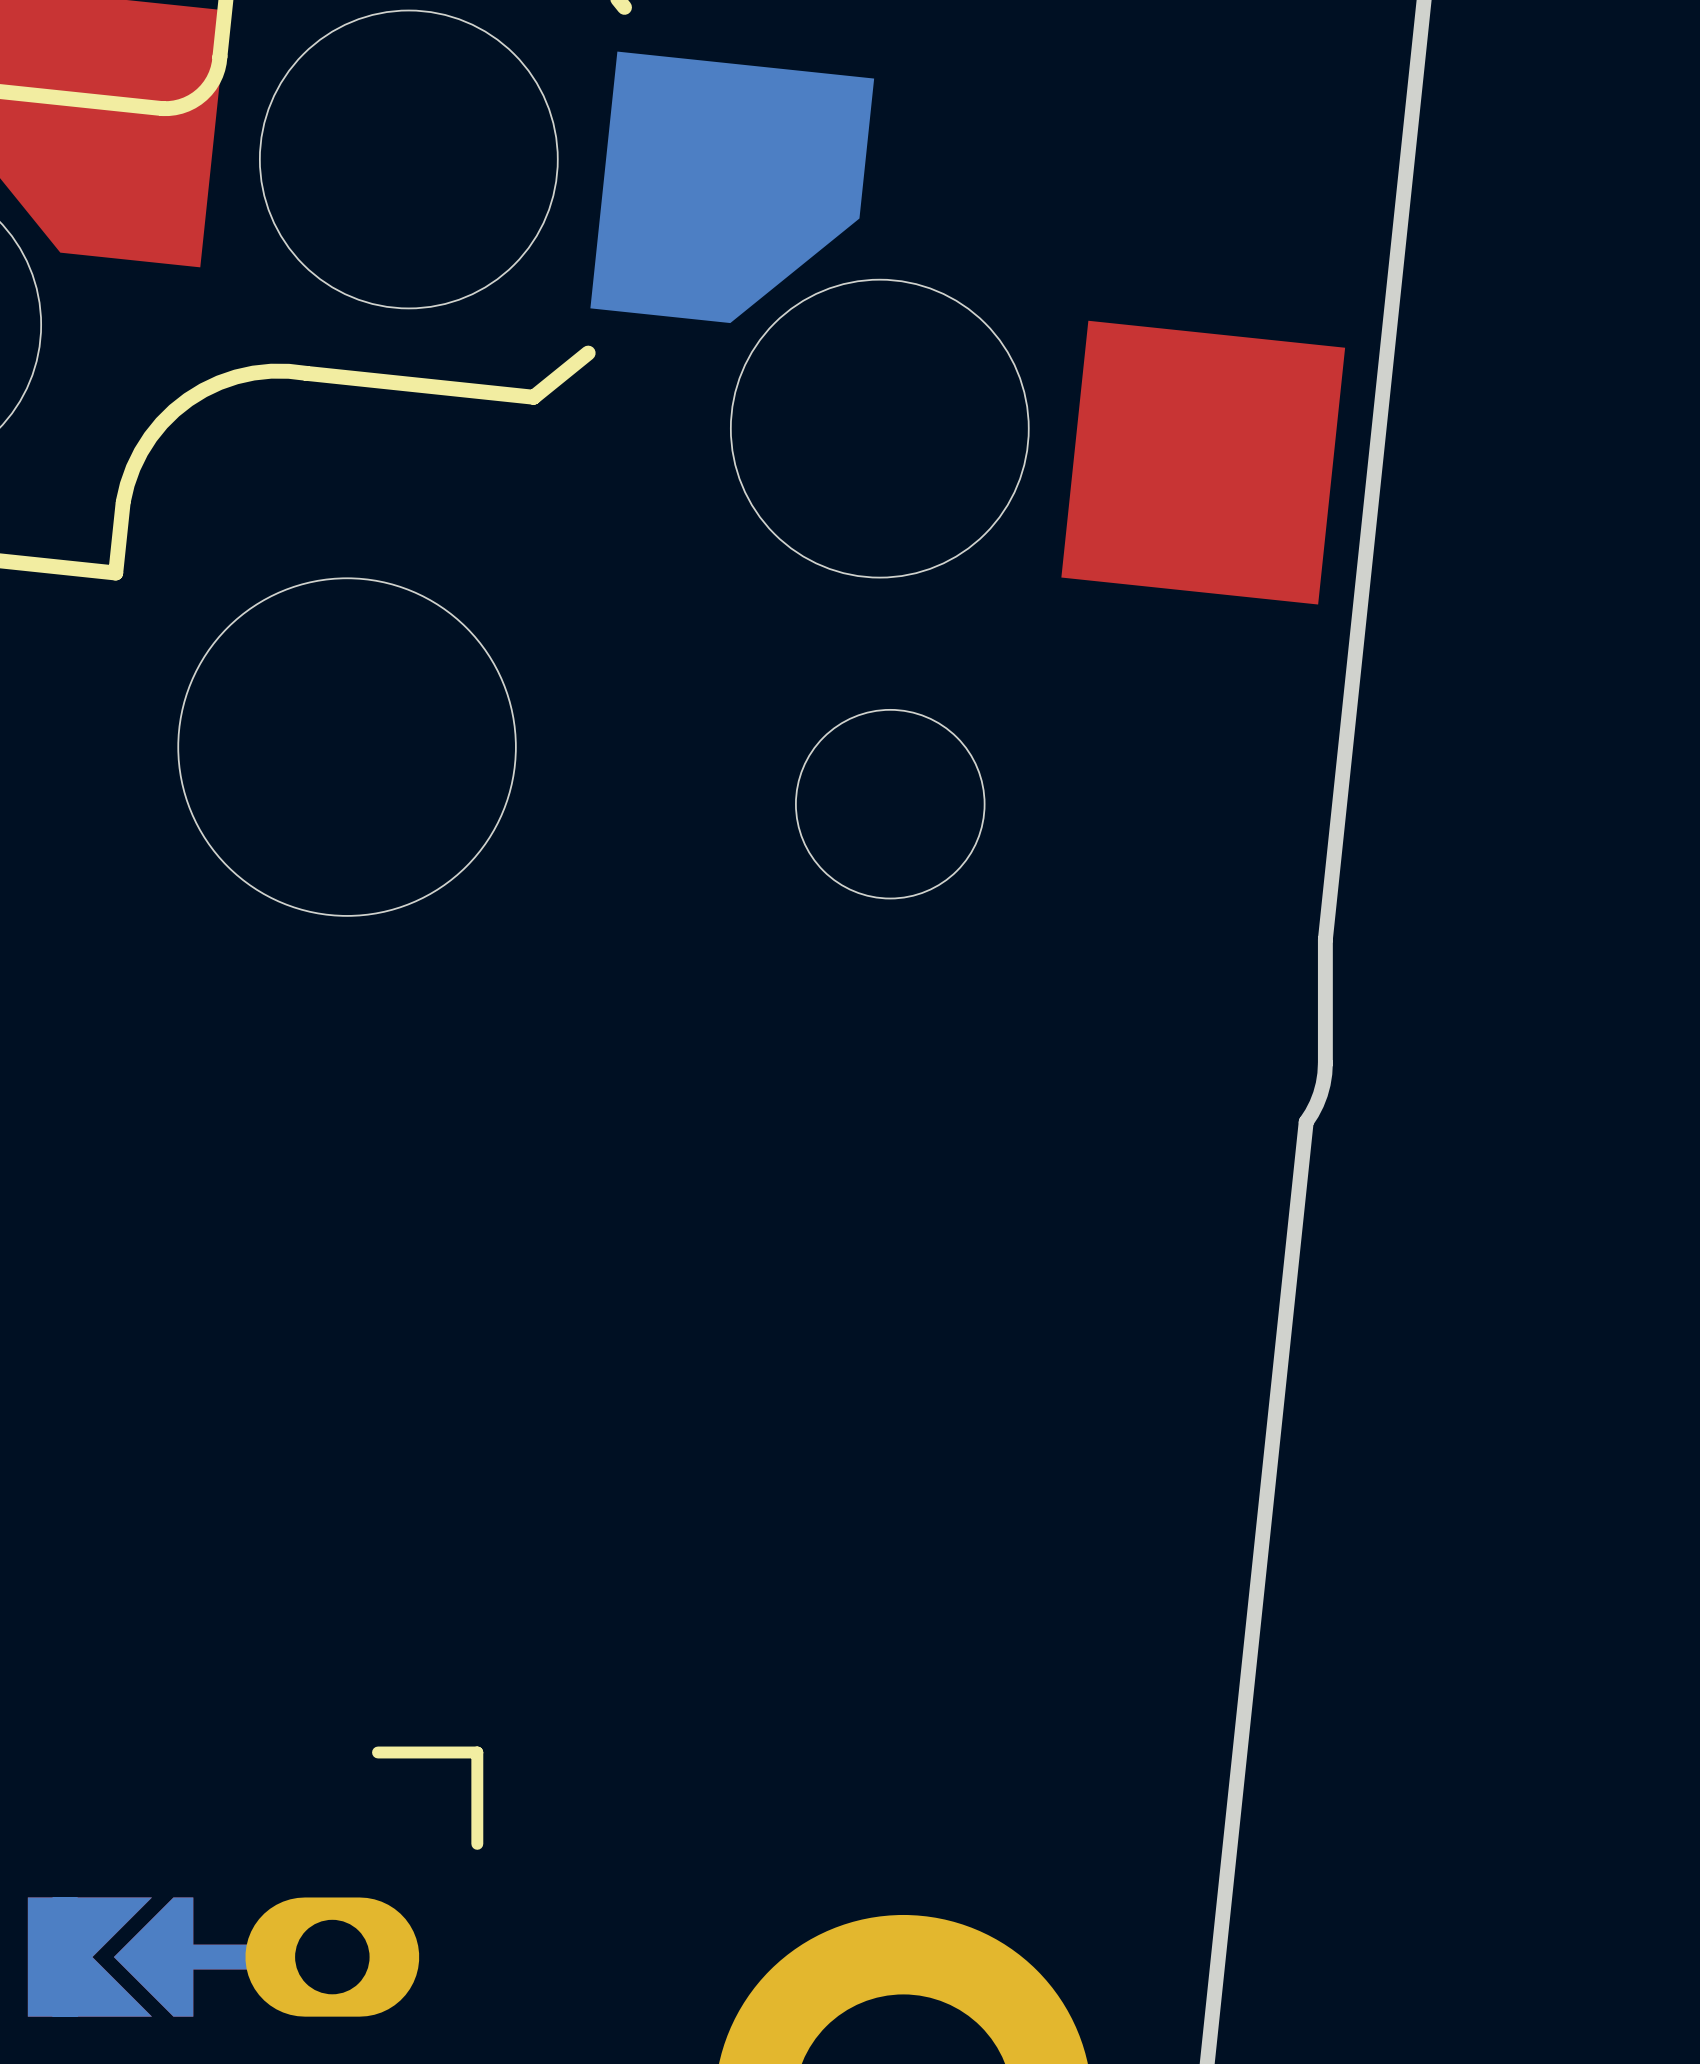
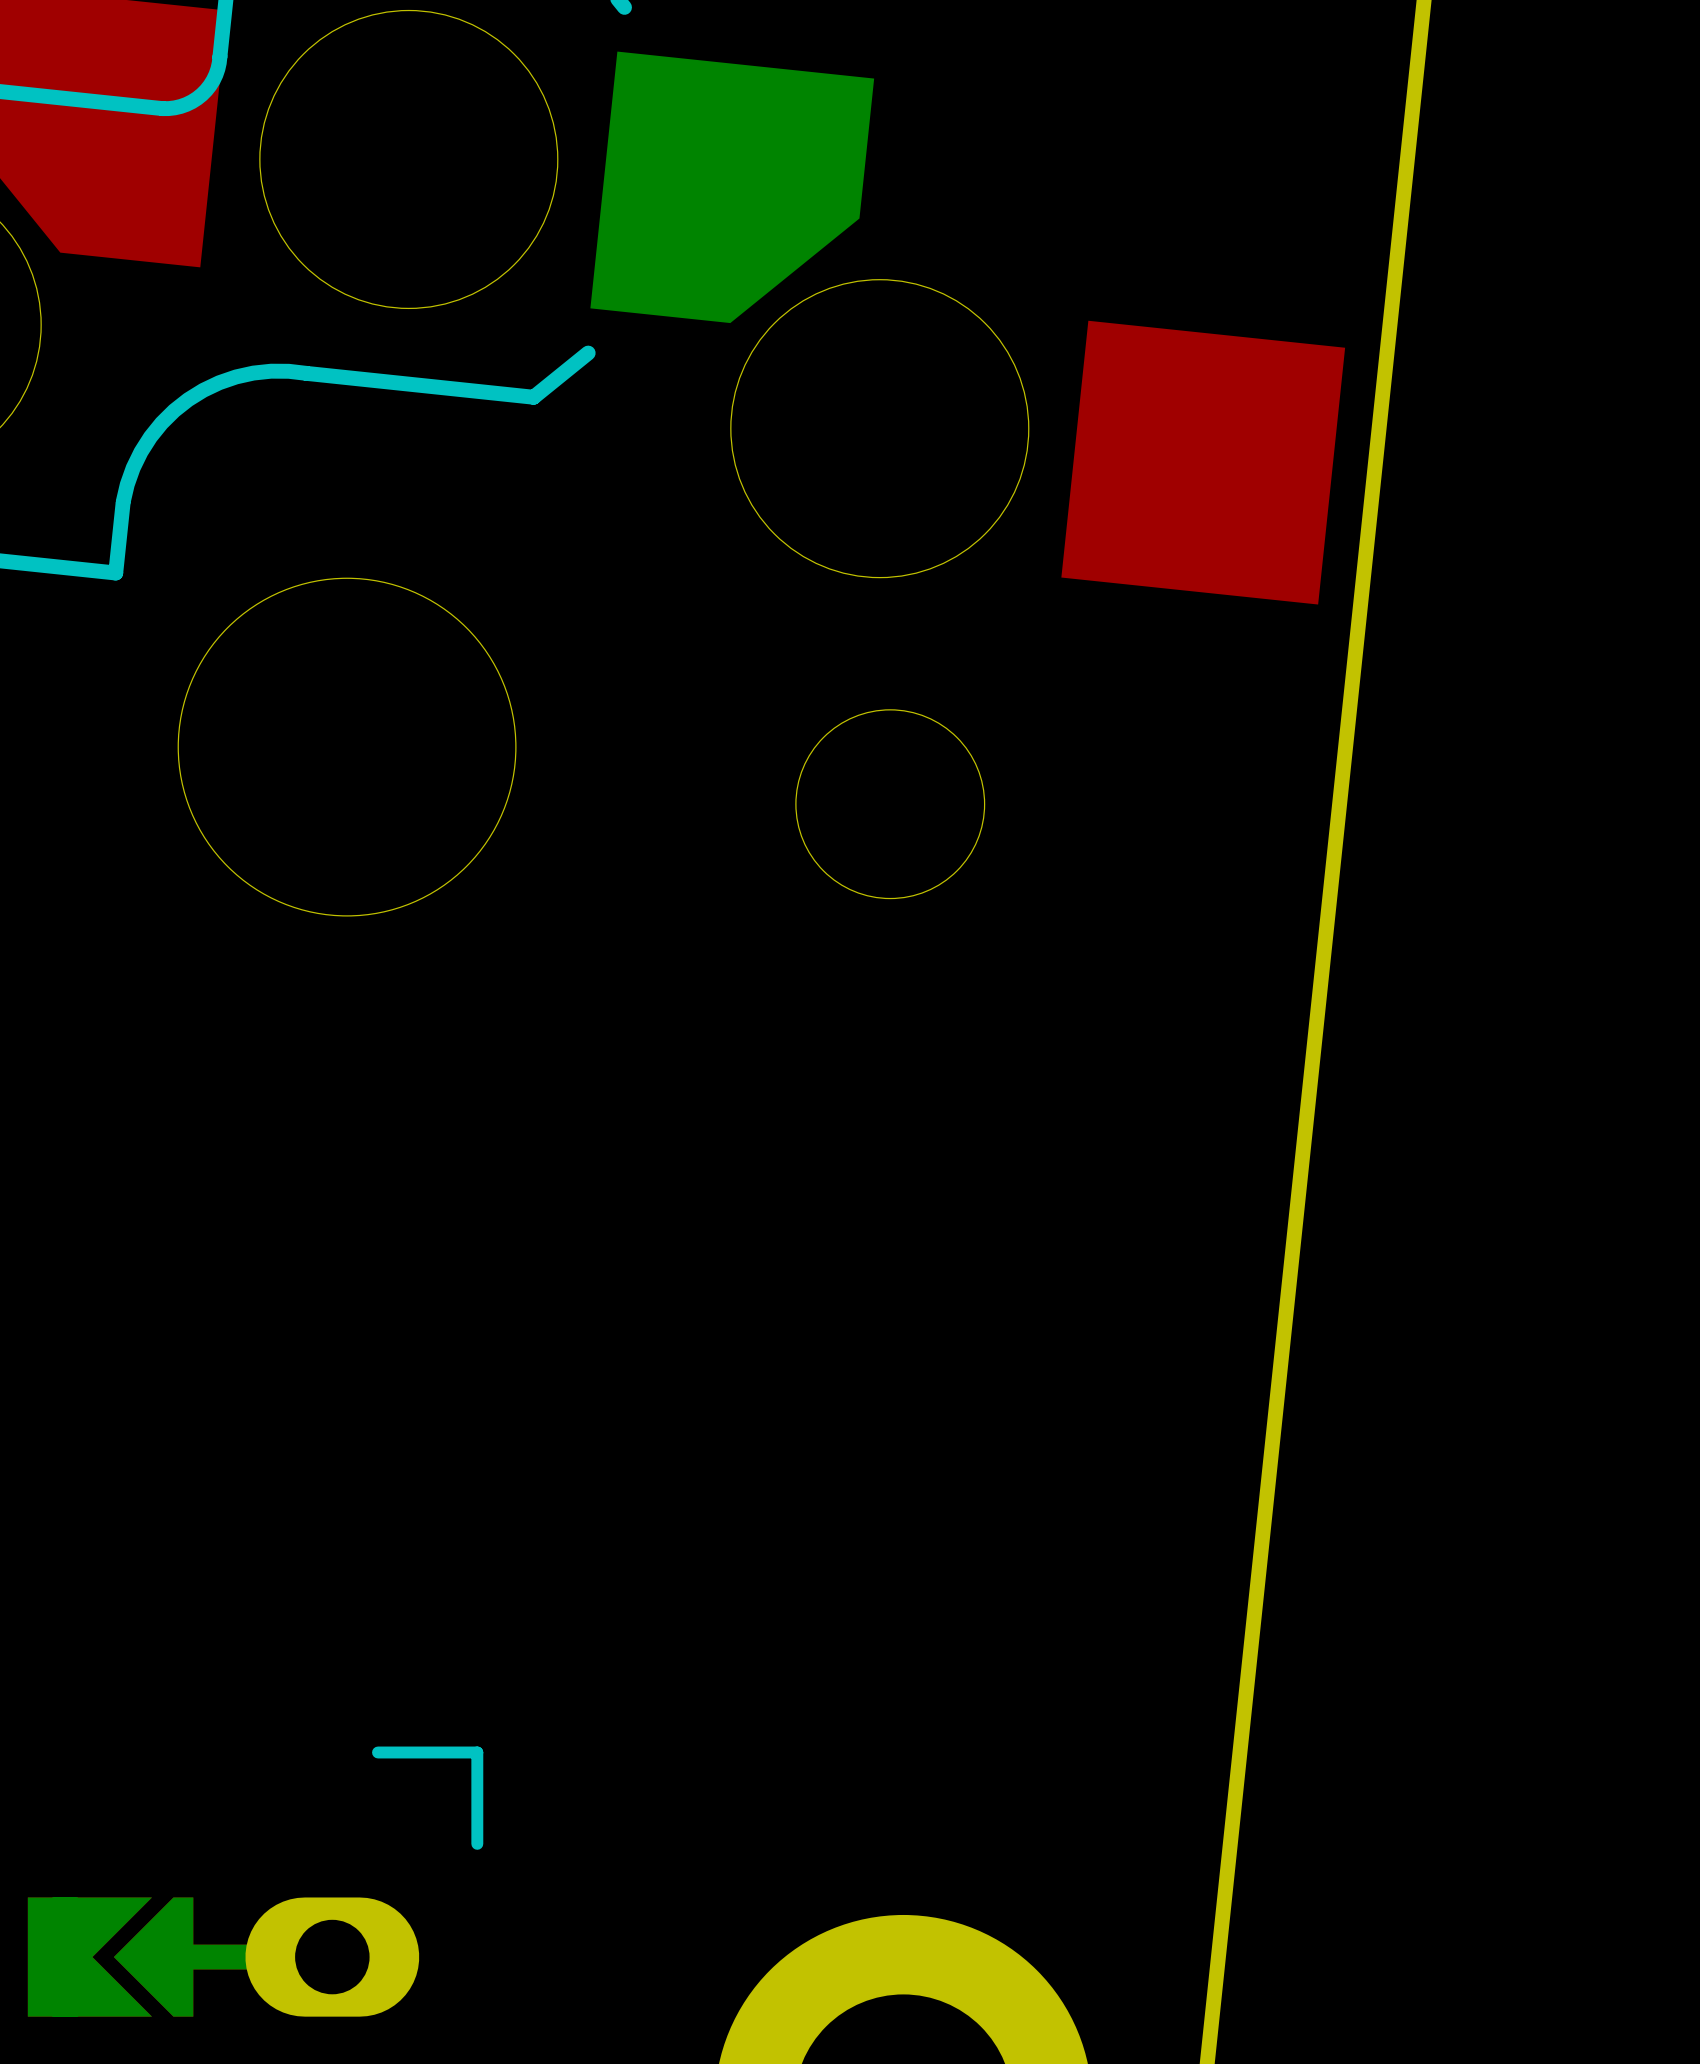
board edge: (1325, 939) (1324, 1073) (1320, 1094) (1306, 1122) -> (1325, 939) (1306, 1122)

